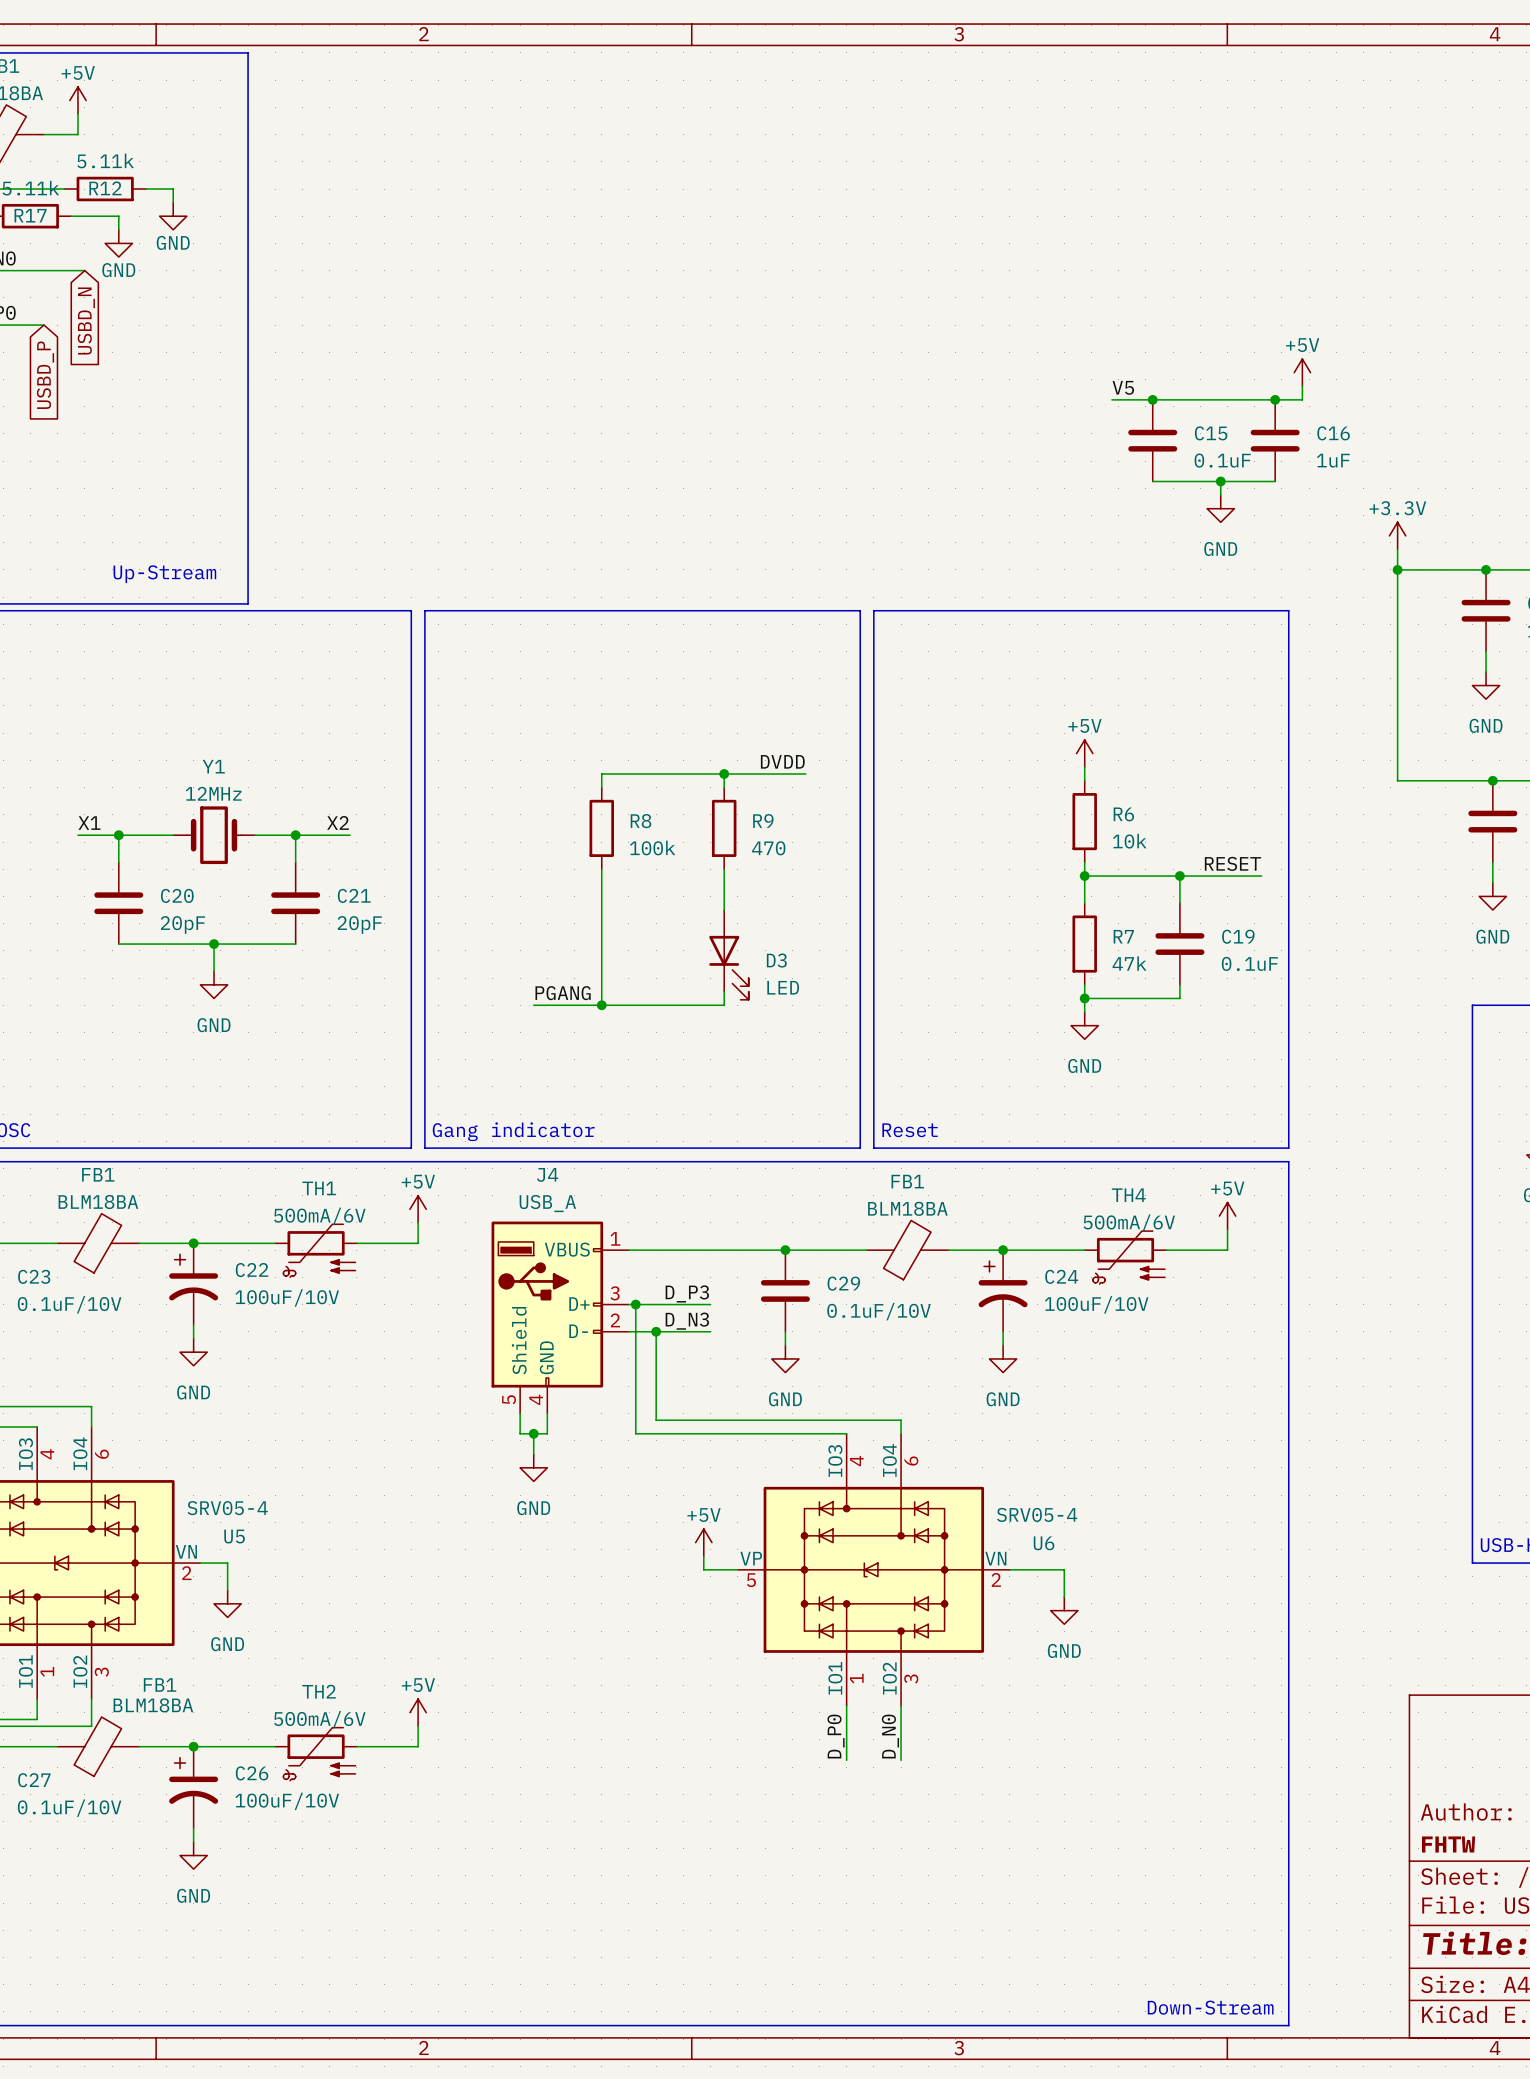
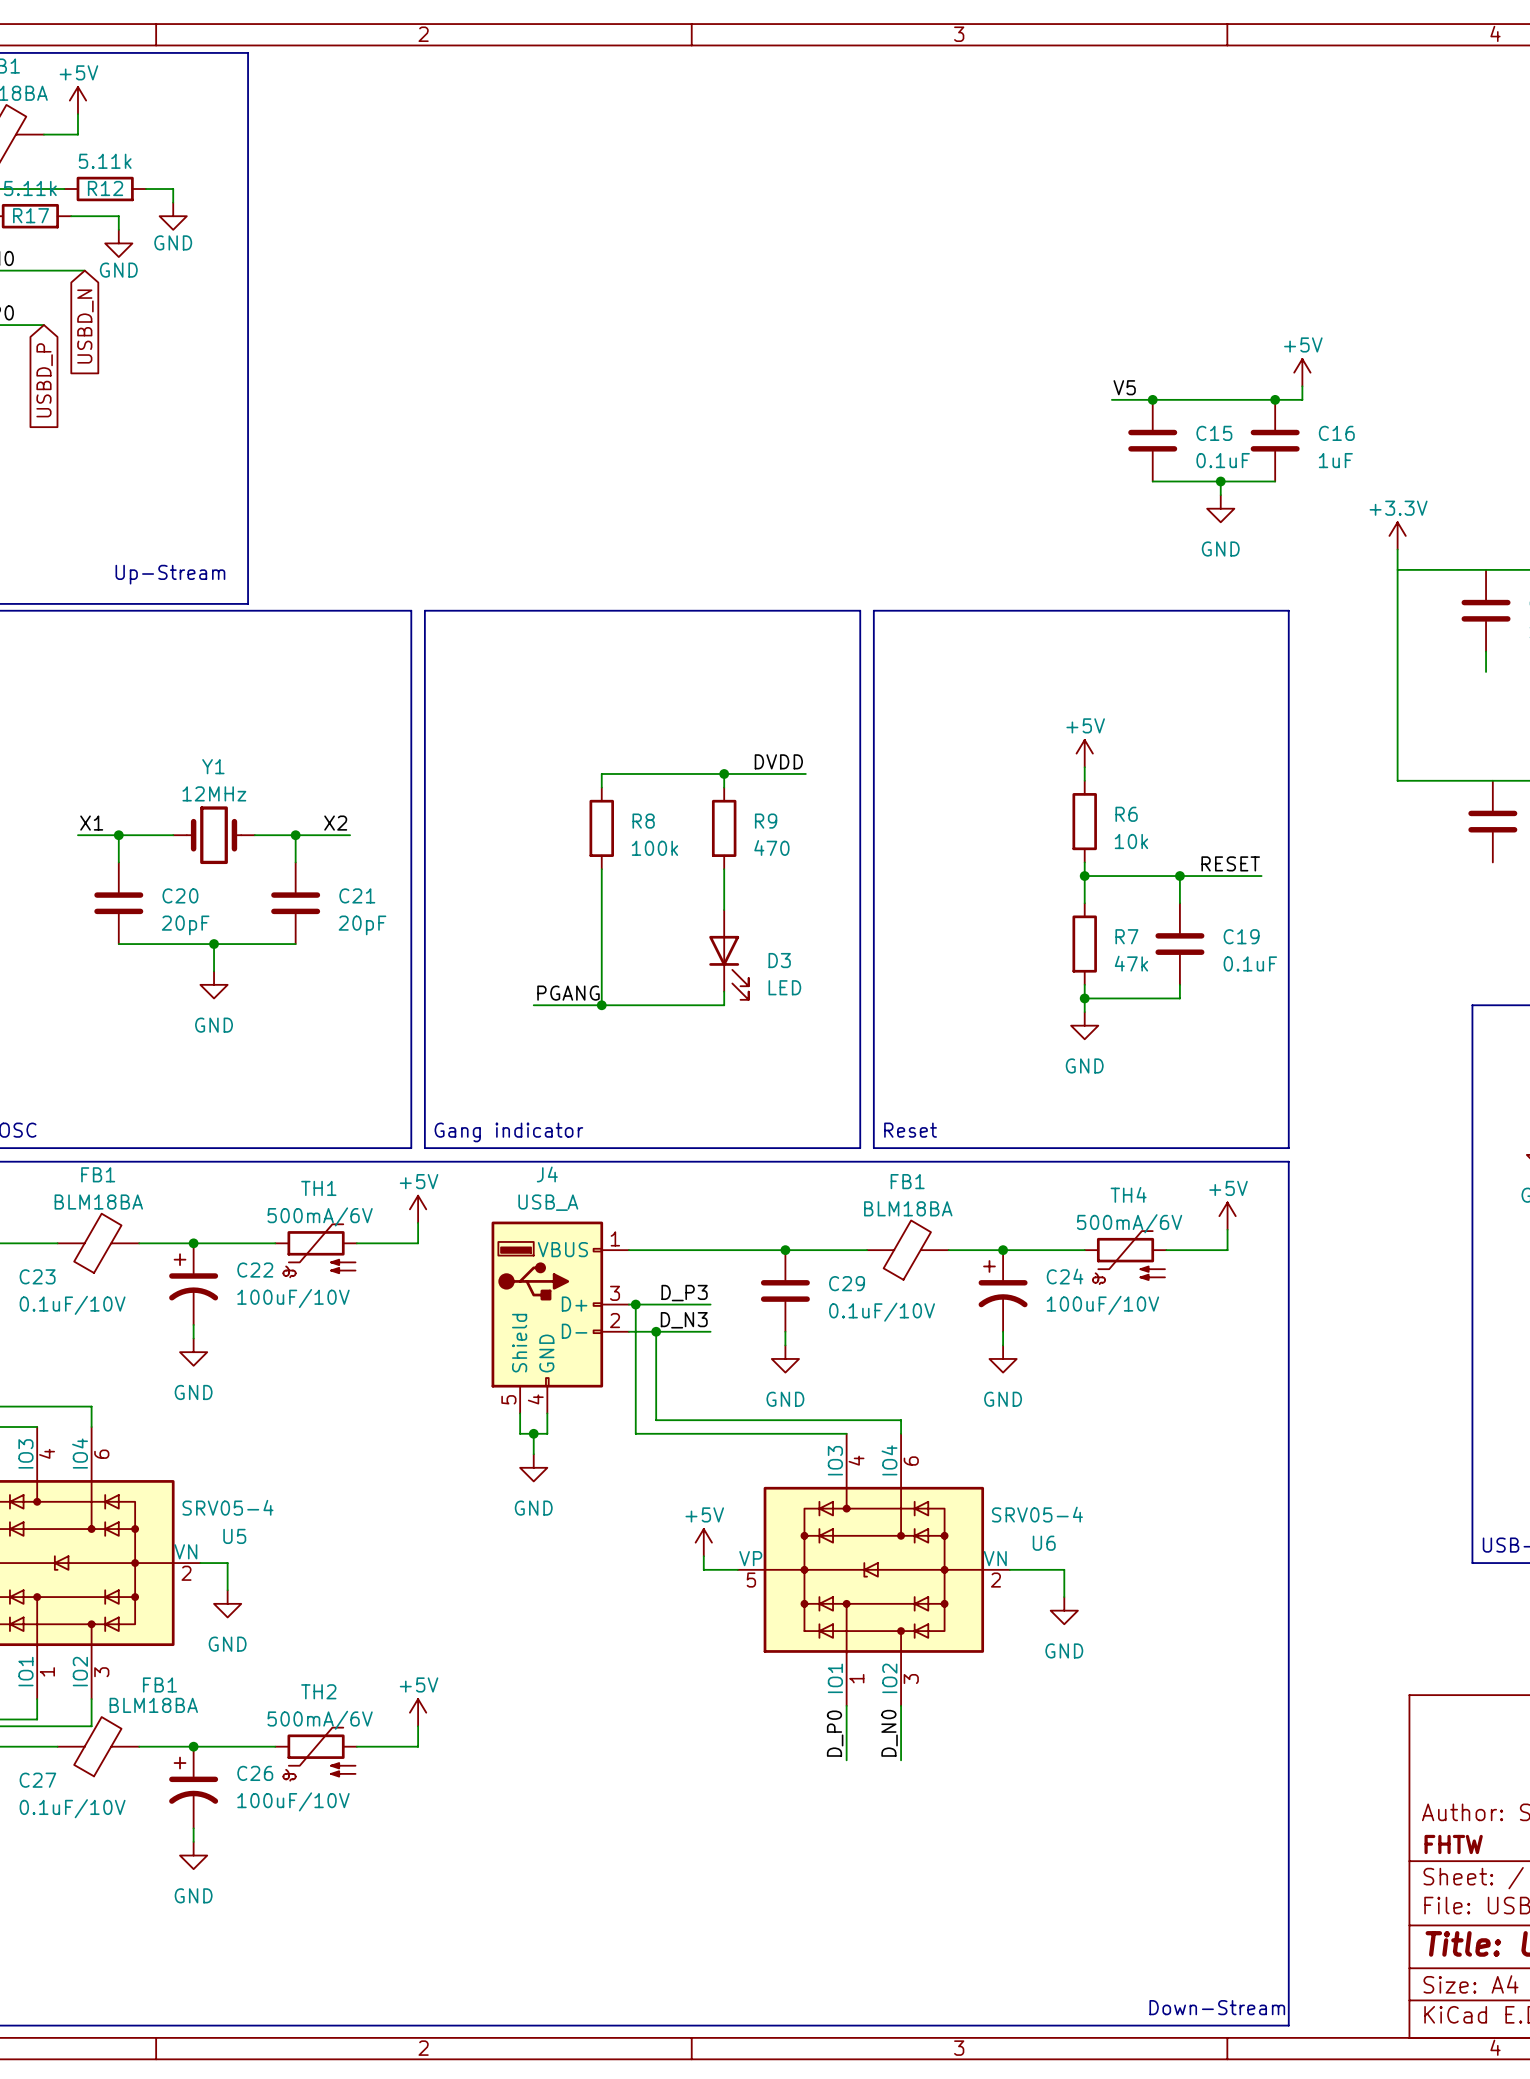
junction: (1397, 569) -> none
junction: (1486, 569) -> none
power symbol: GND (1486, 685) -> none
junction: (1492, 780) -> none
wire: (1492, 862) (1492, 882) -> none
power symbol: GND (1492, 896) -> none

